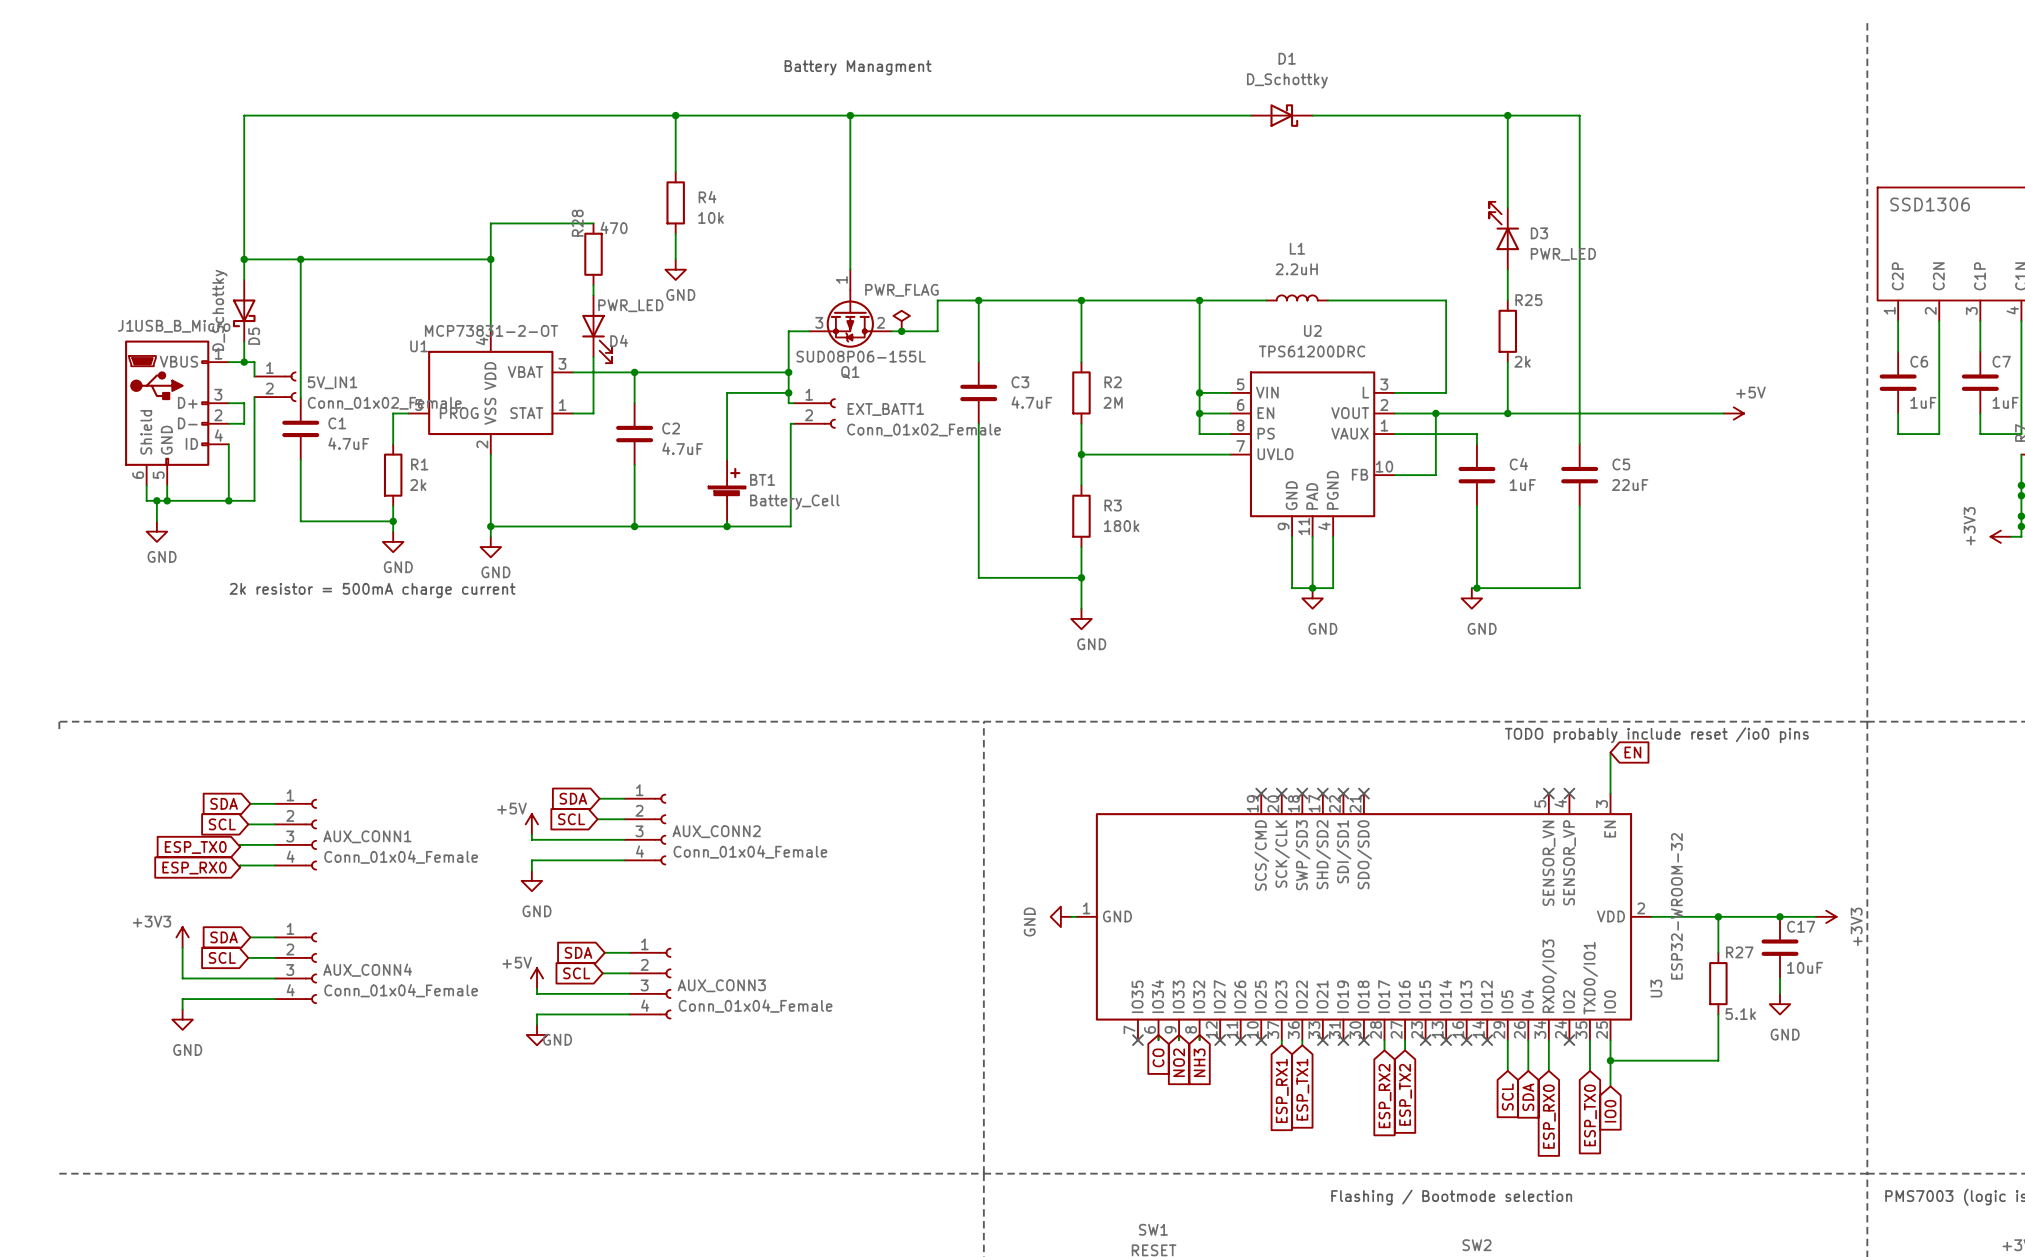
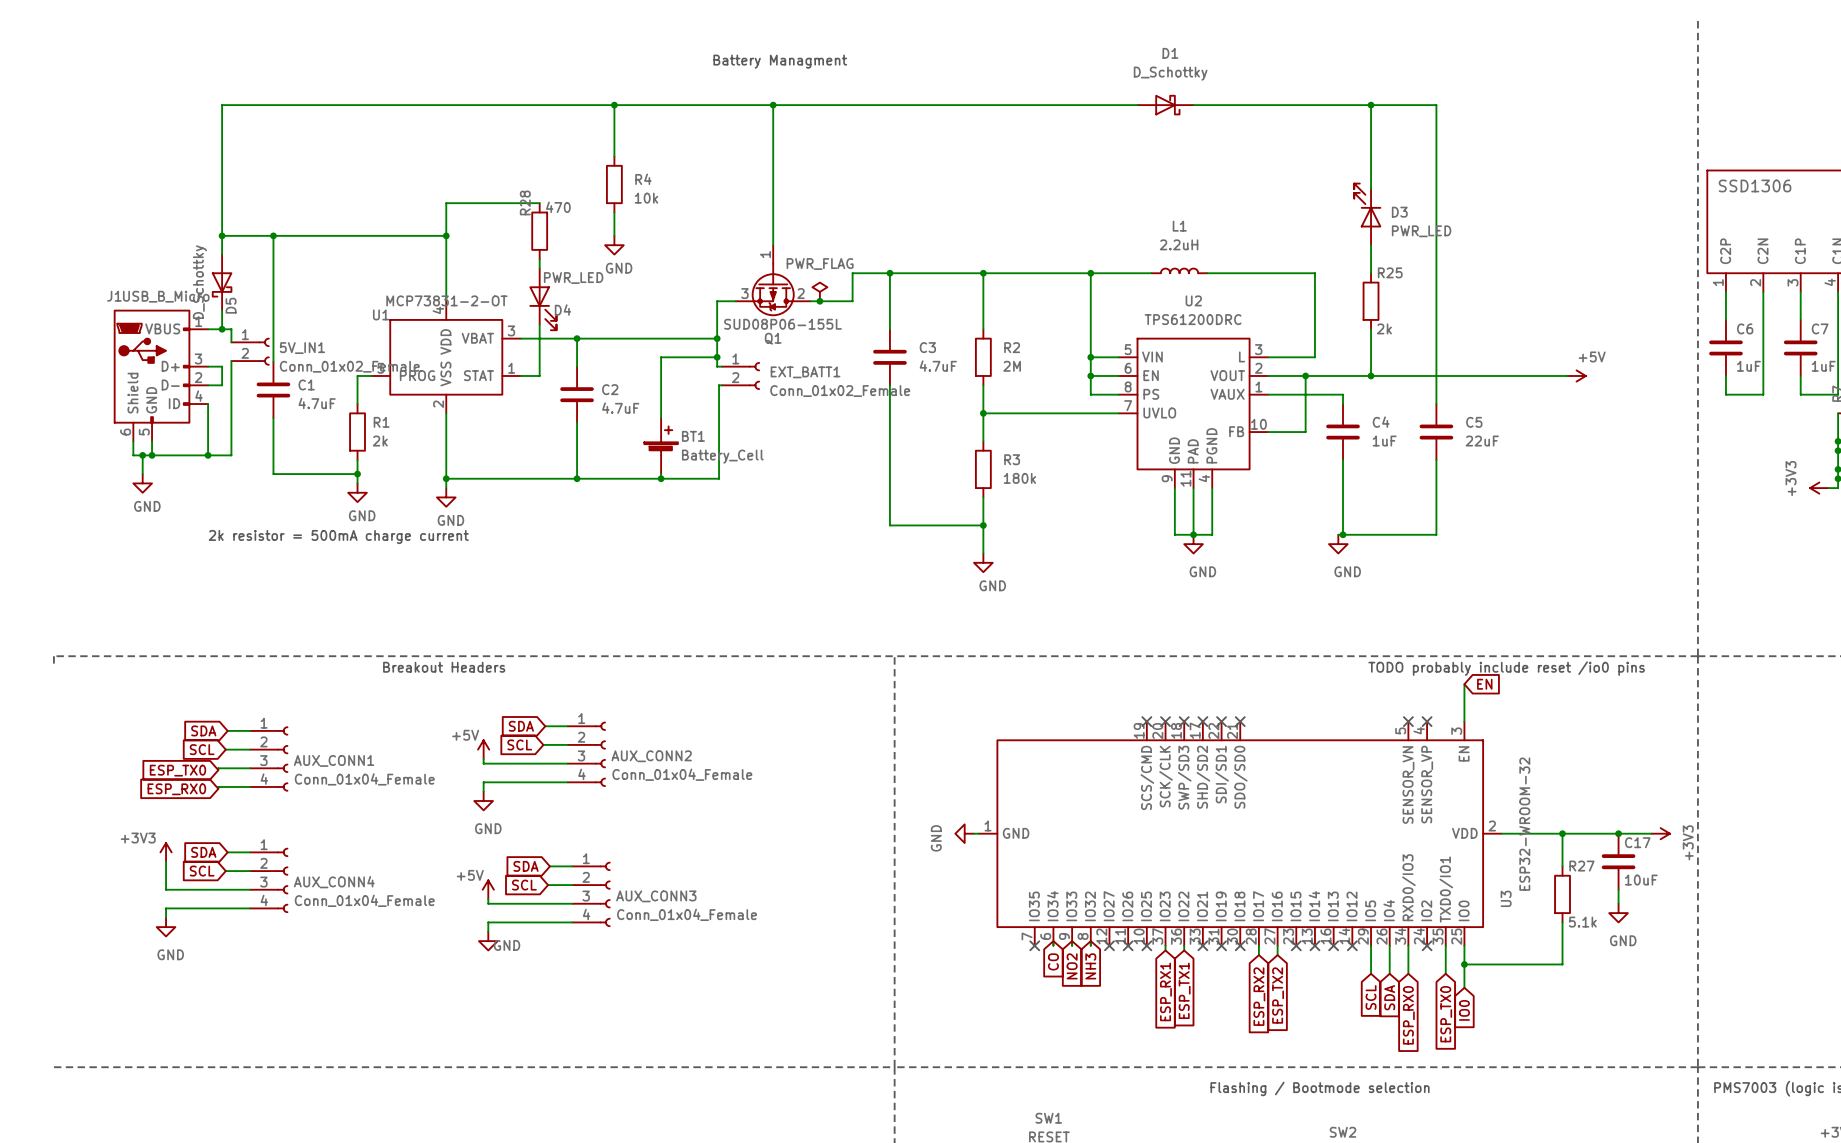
text: none -> Breakout Headers (444, 667)

